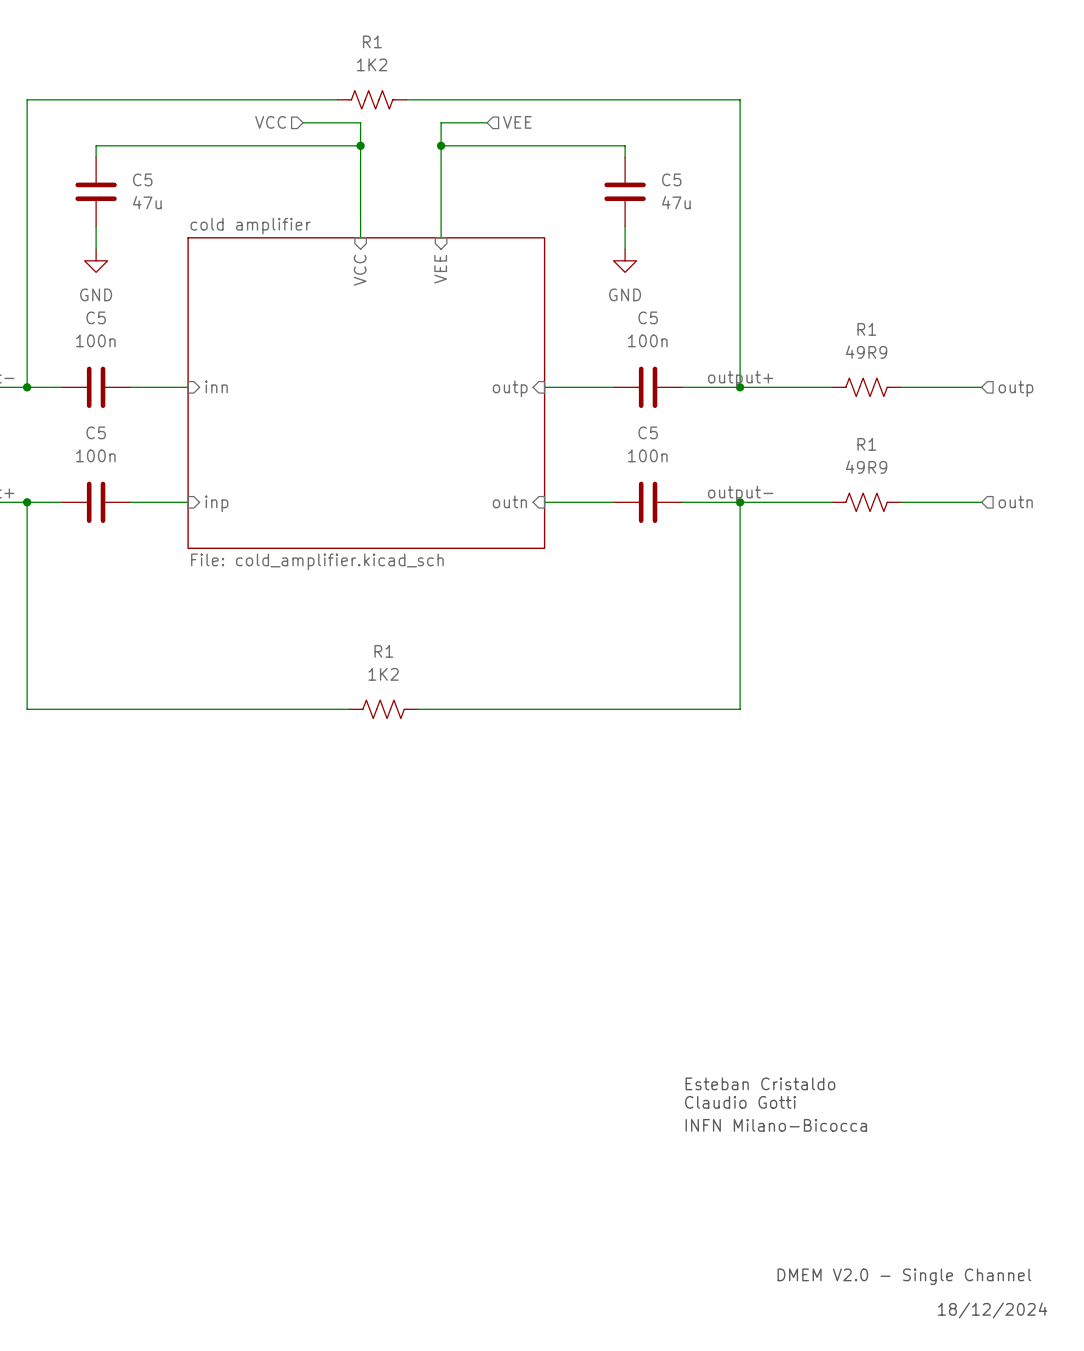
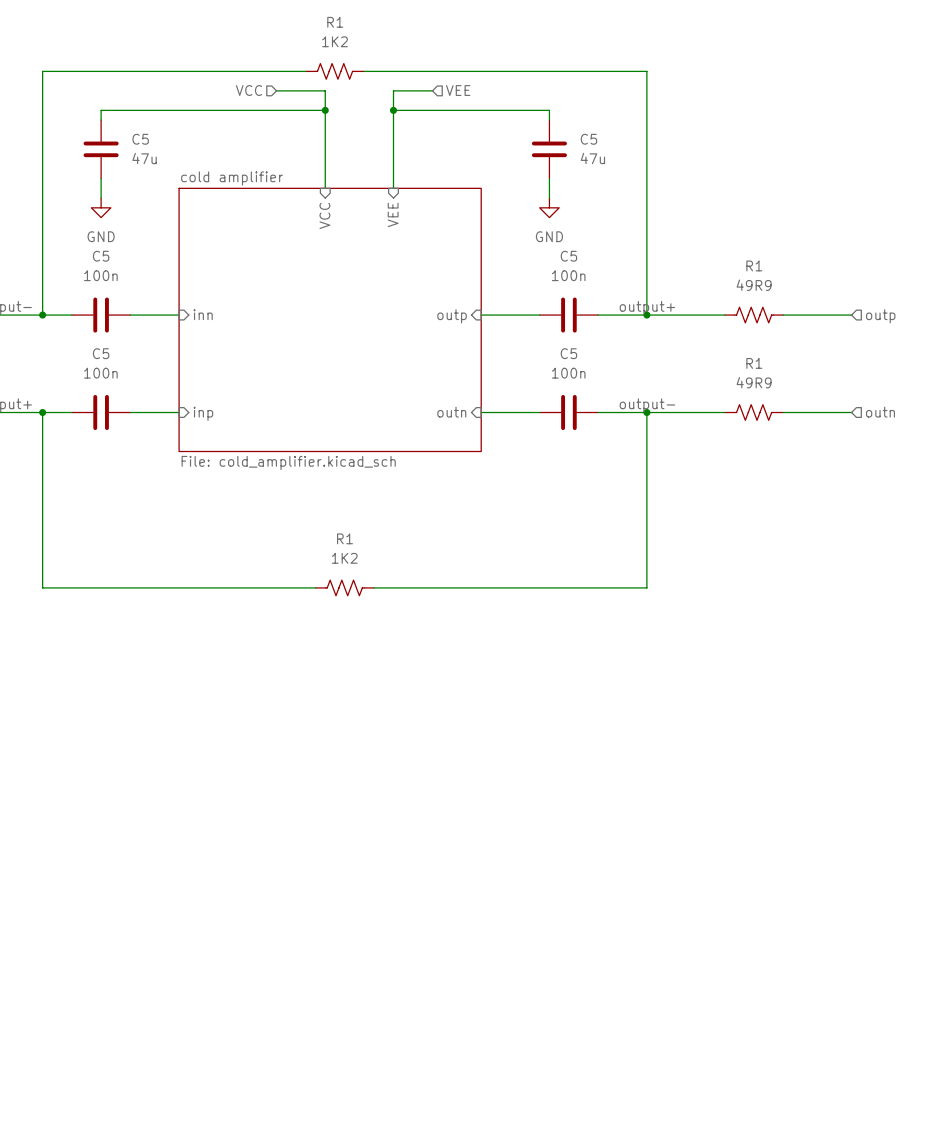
text: Esteban Cristaldo (760, 1083) -> none
text: Claudio Gotti (740, 1102) -> none
text: INFN Milano-Bicocca (776, 1125) -> none
text: DMEM V2.0 - Single Channel (904, 1276) -> none
text: 18/12/2024 (992, 1310) -> none

